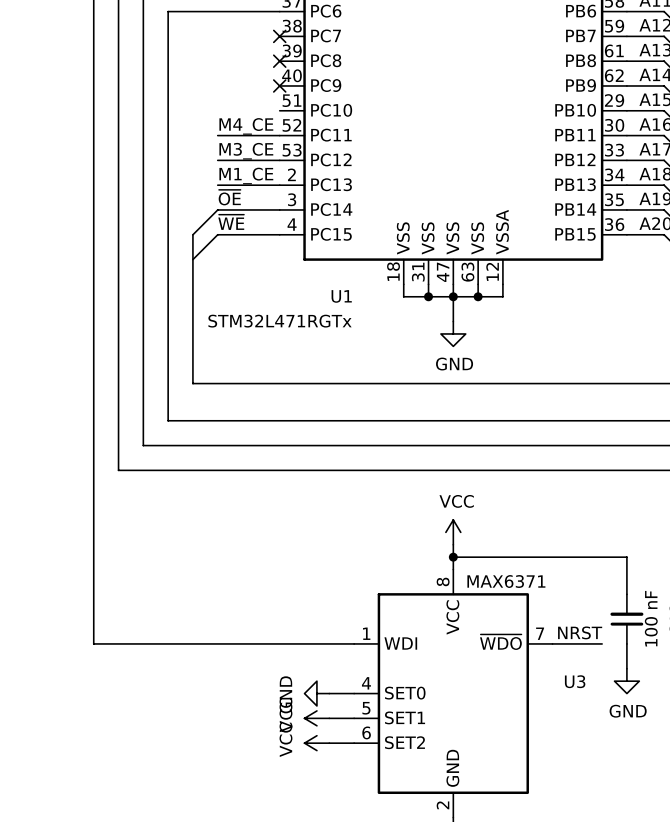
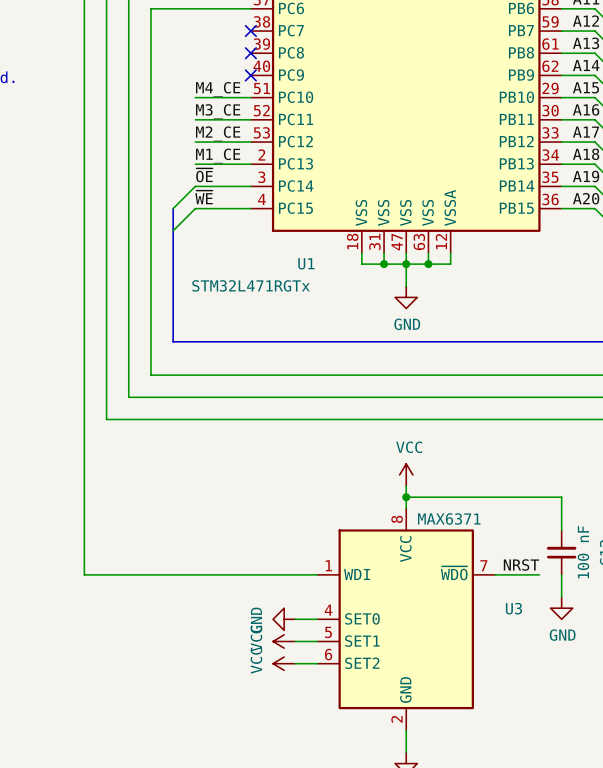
label: none -> M4_CE (218, 89)
wire: none -> (195, 97) (250, 97)
label: M4_CE (246, 126) -> M3_CE (218, 111)
label: M3_CE (246, 151) -> M2_CE (218, 133)

